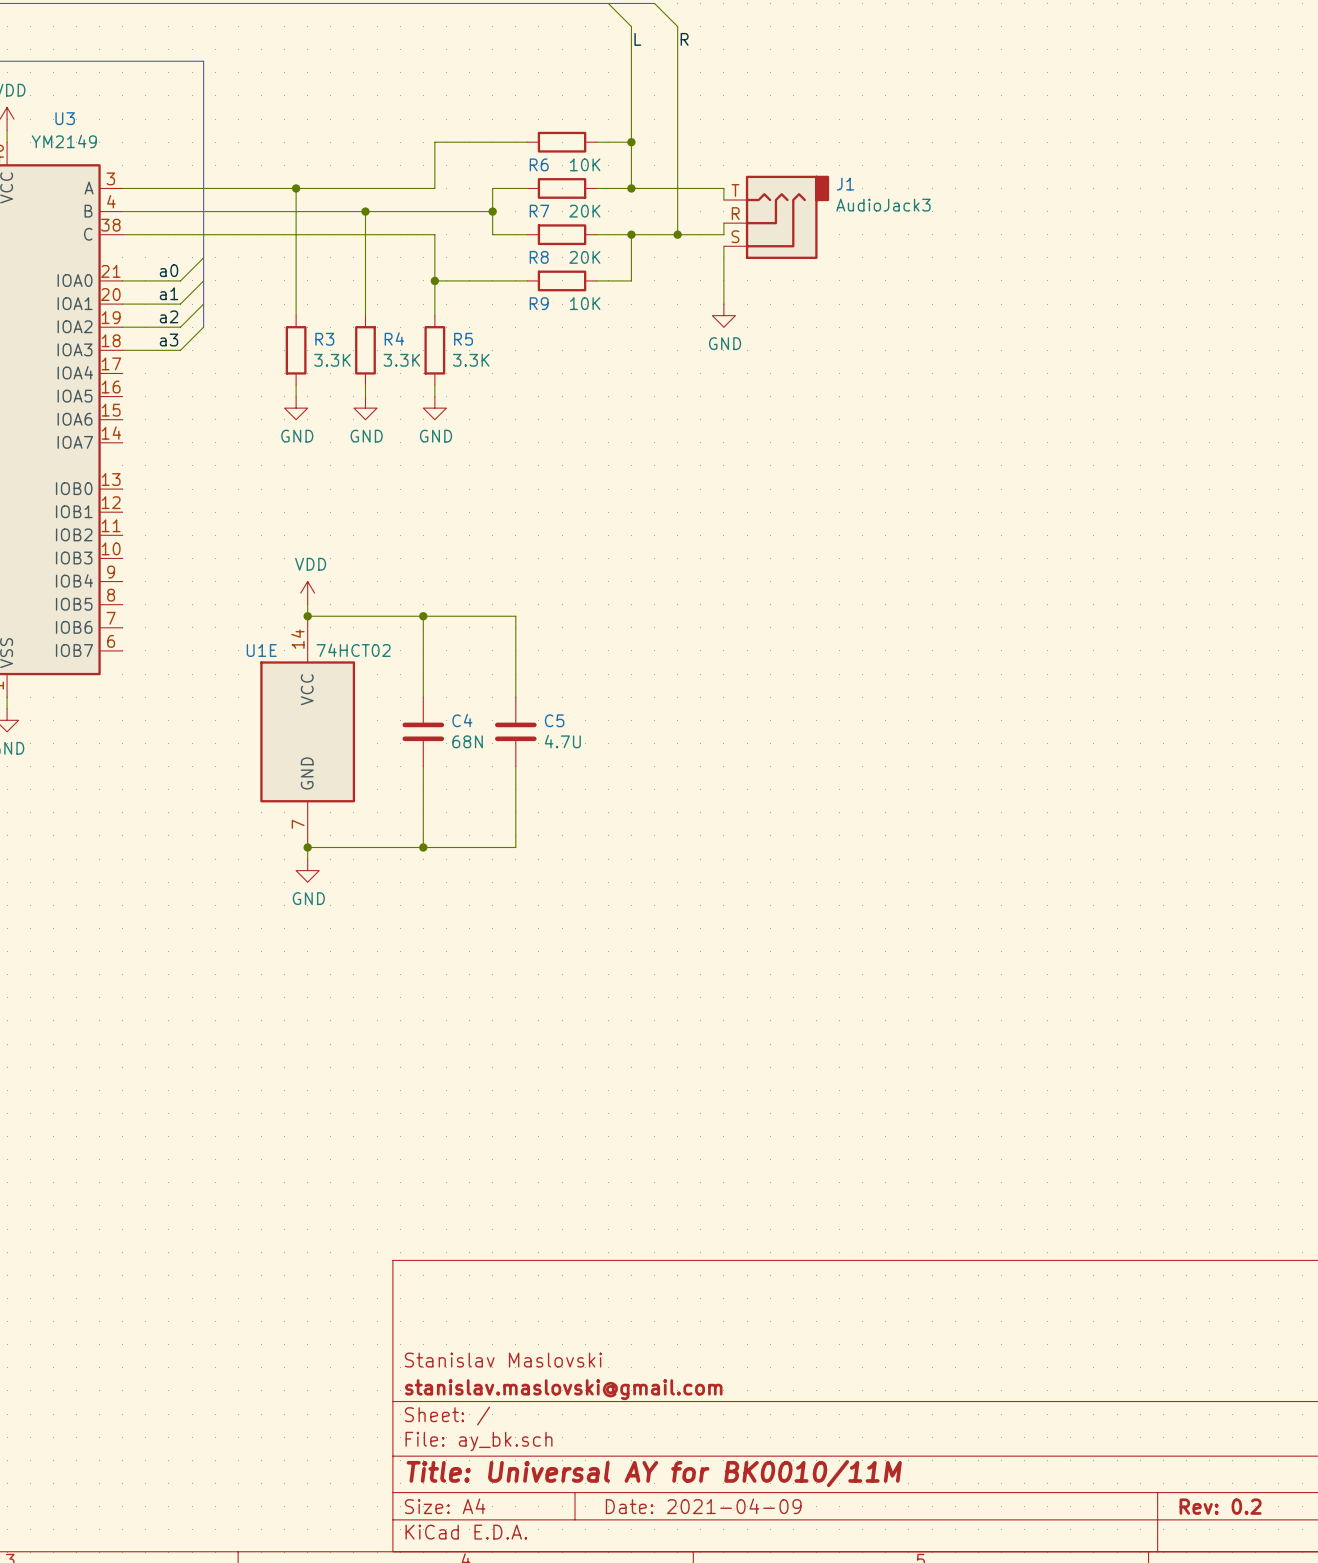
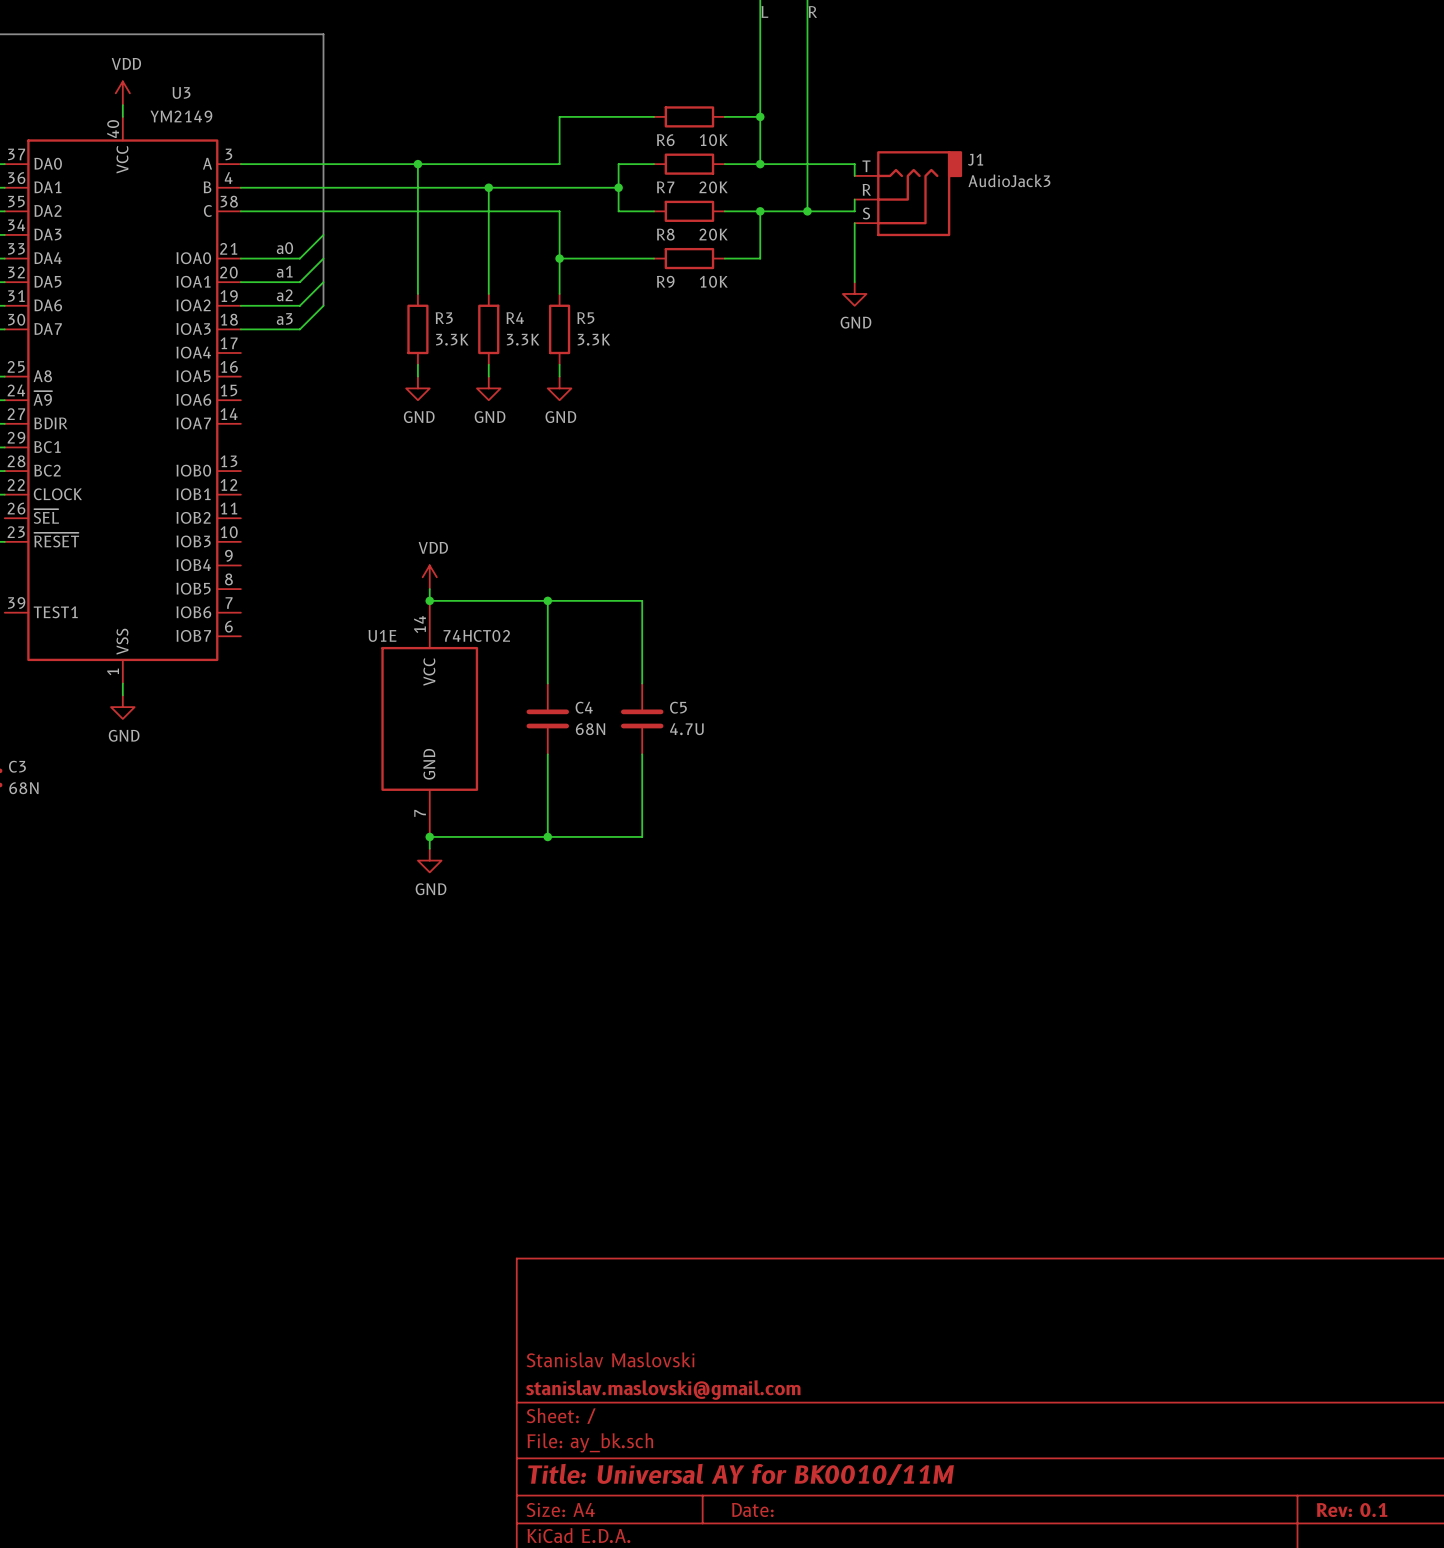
title block: Date: 2021-04-09 (703, 1506) -> Date: (752, 1510)
title block: Rev: 0.2 (1220, 1506) -> Rev: 0.1 (1352, 1510)

